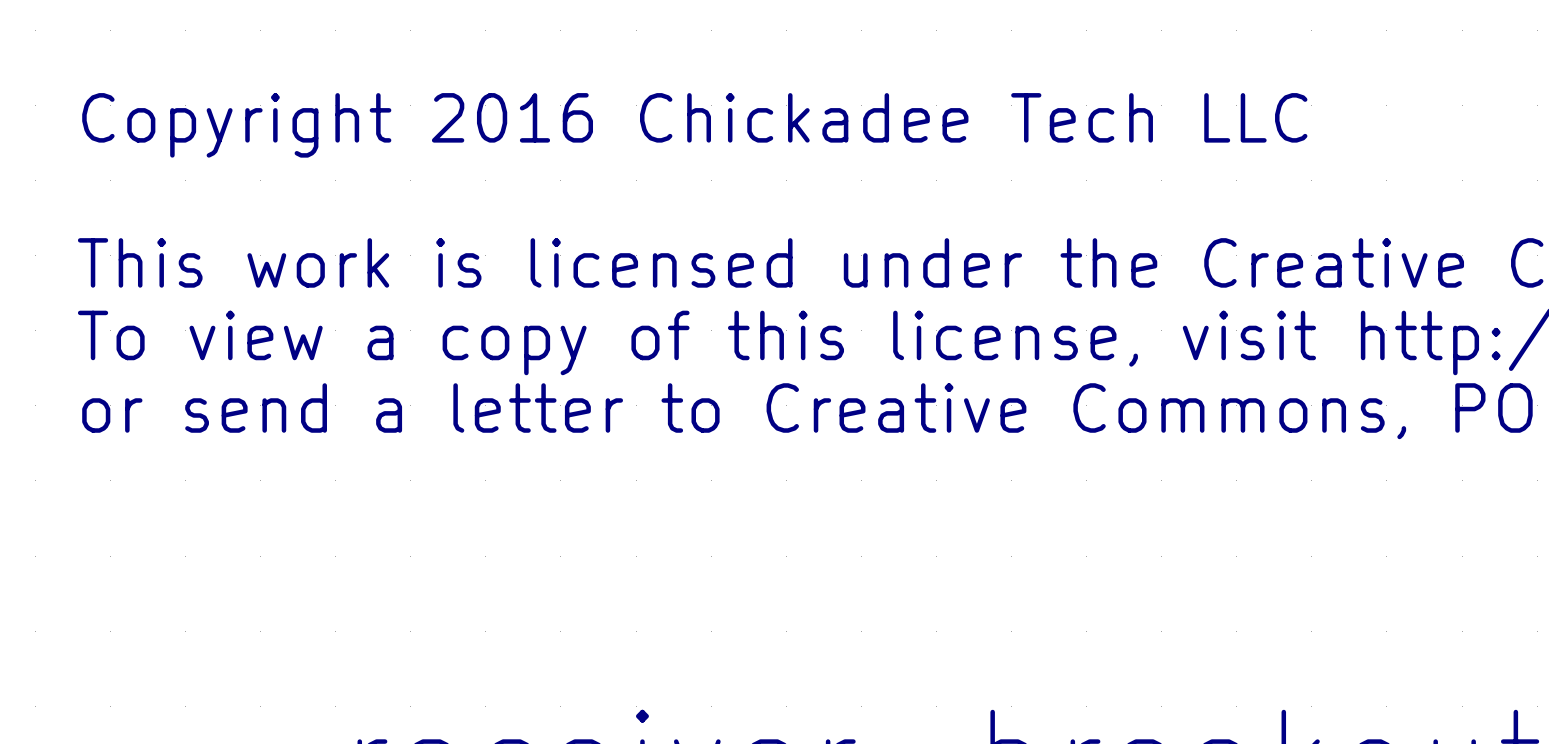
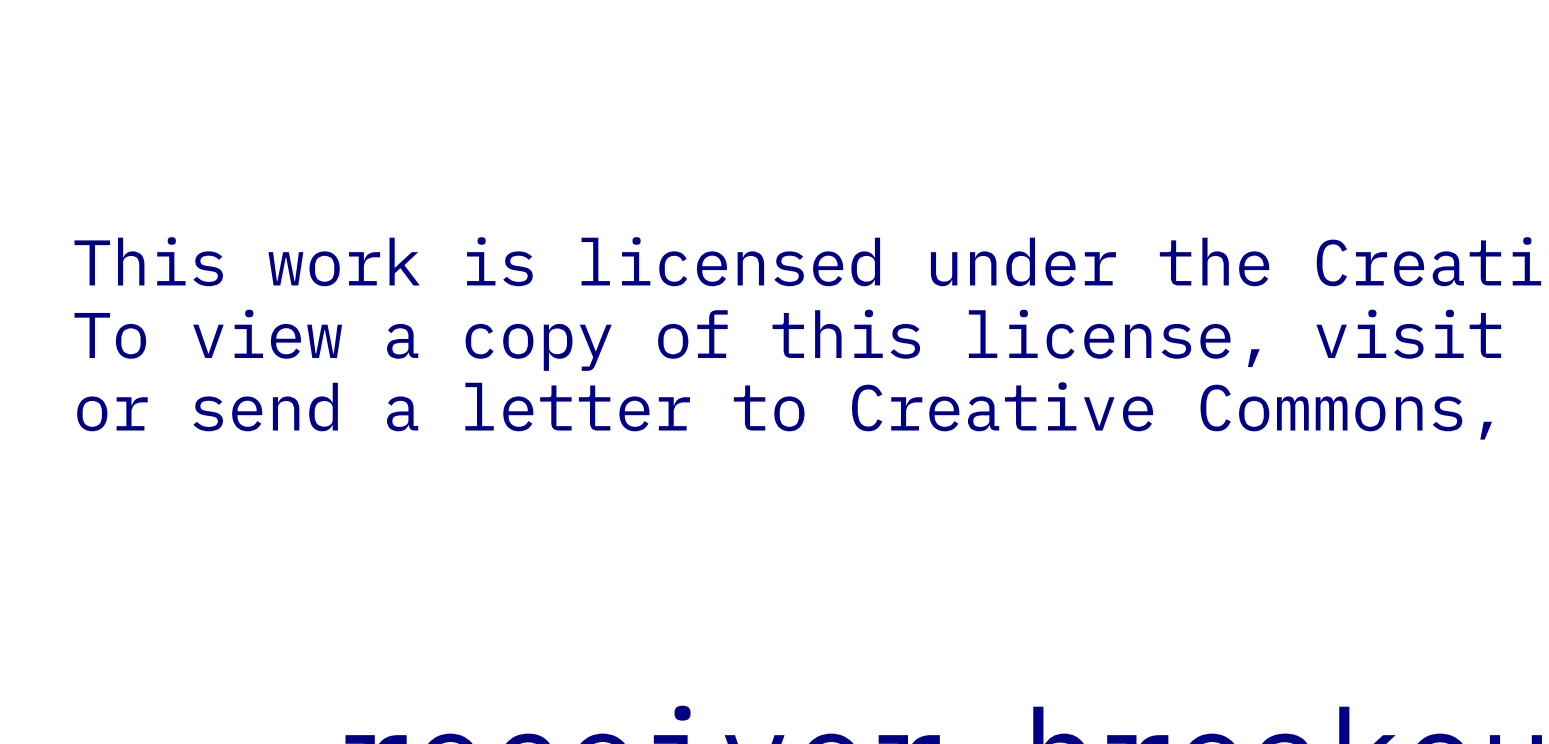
text: Copyright 2016 Chickadee Tech LLC (694, 125) -> none

